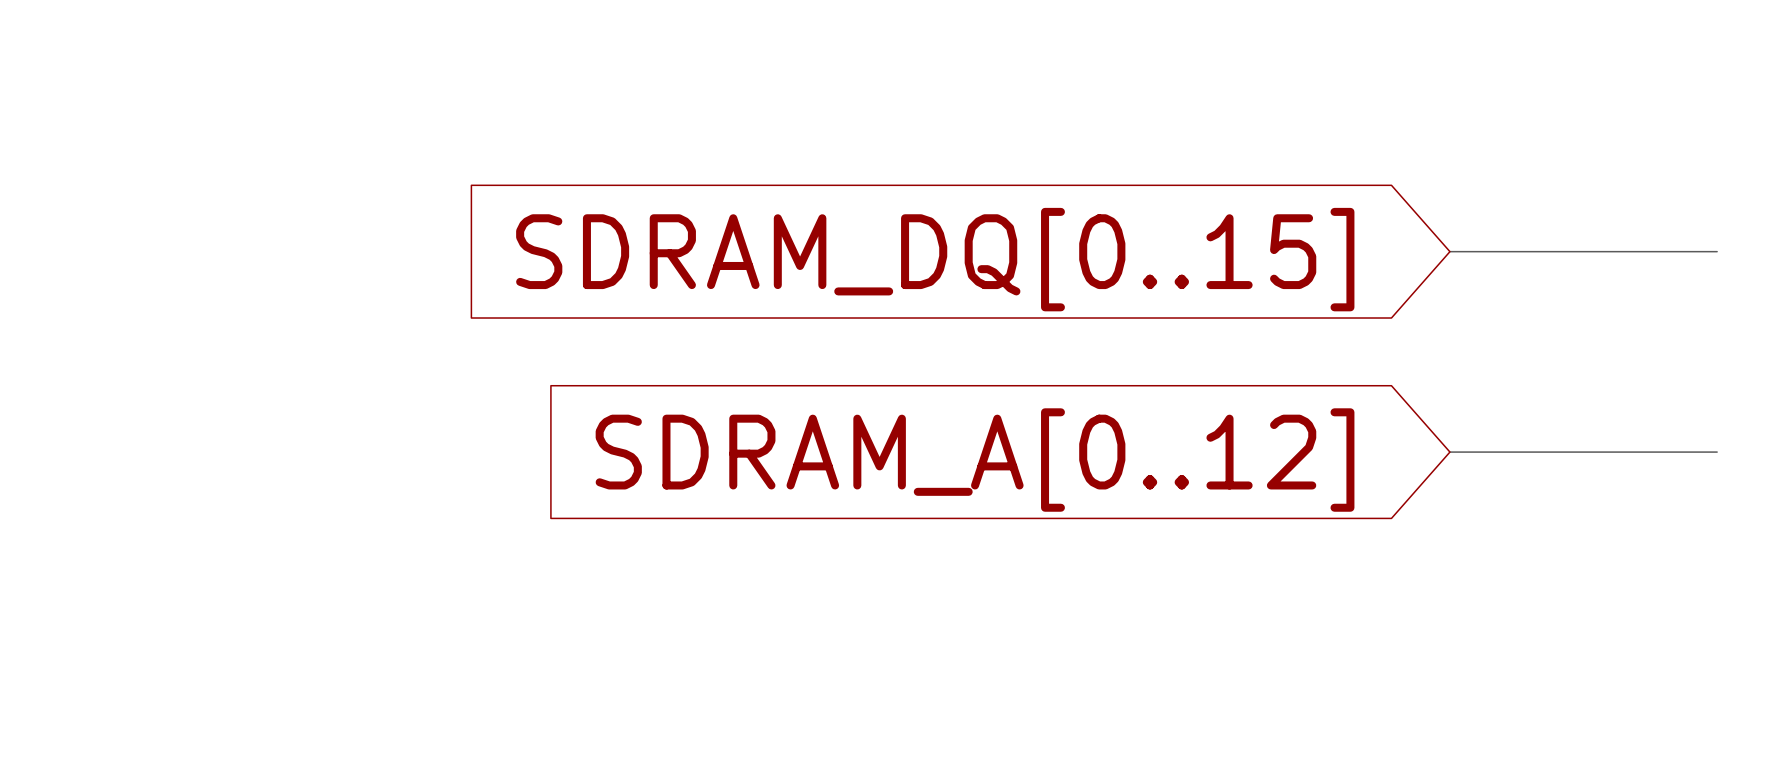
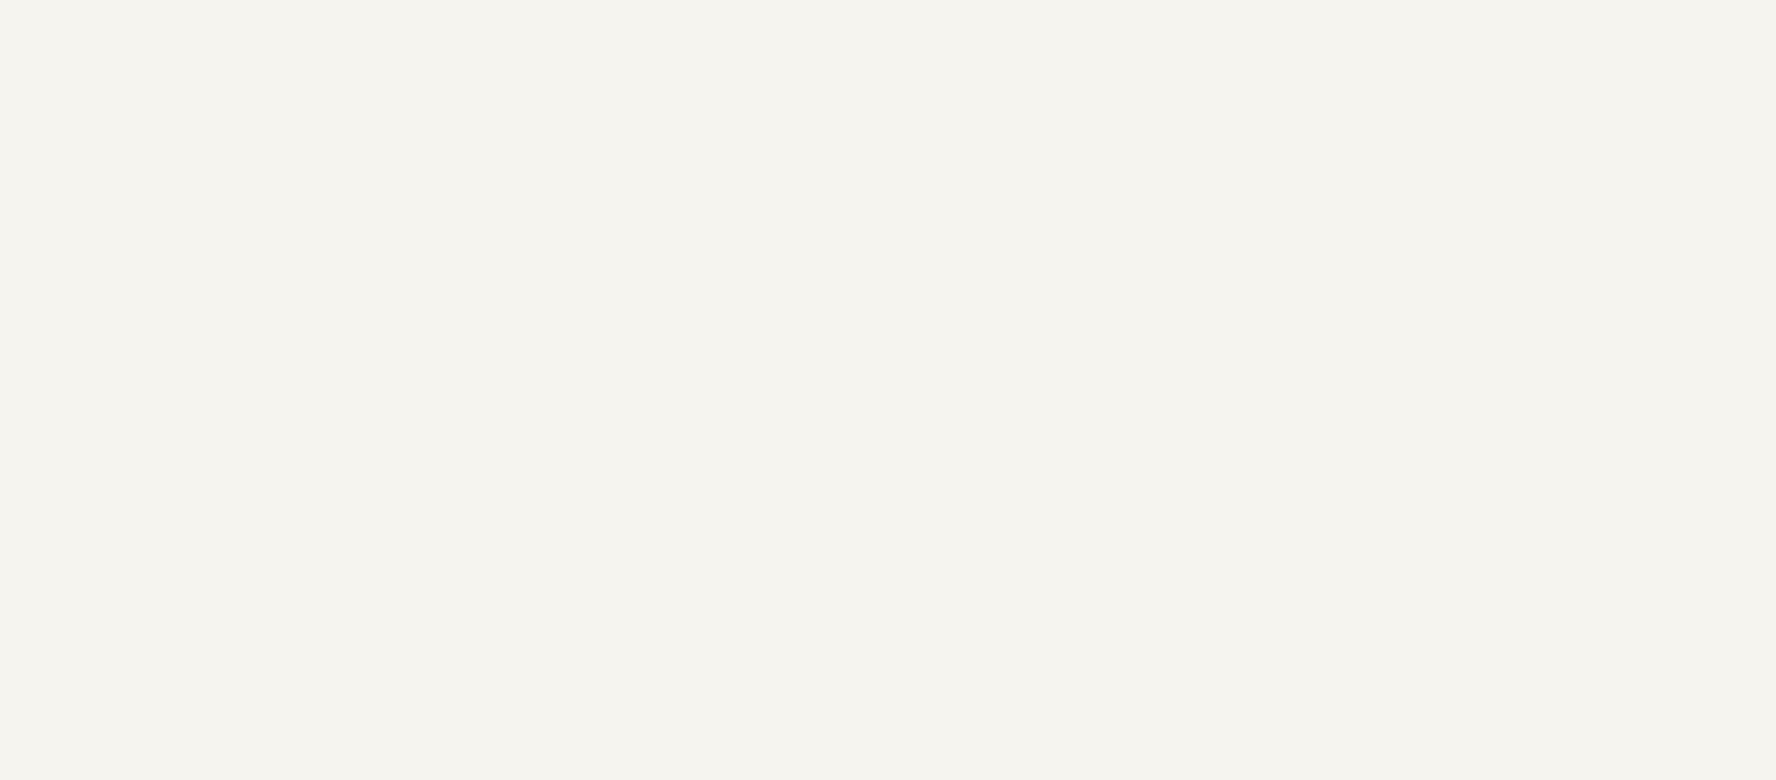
bus: (1449, 251) (1717, 251) -> none
global label: SDRAM_DQ[0..15] (935, 259) -> none
bus: (1449, 452) (1717, 452) -> none
global label: SDRAM_A[0..12] (975, 460) -> none

